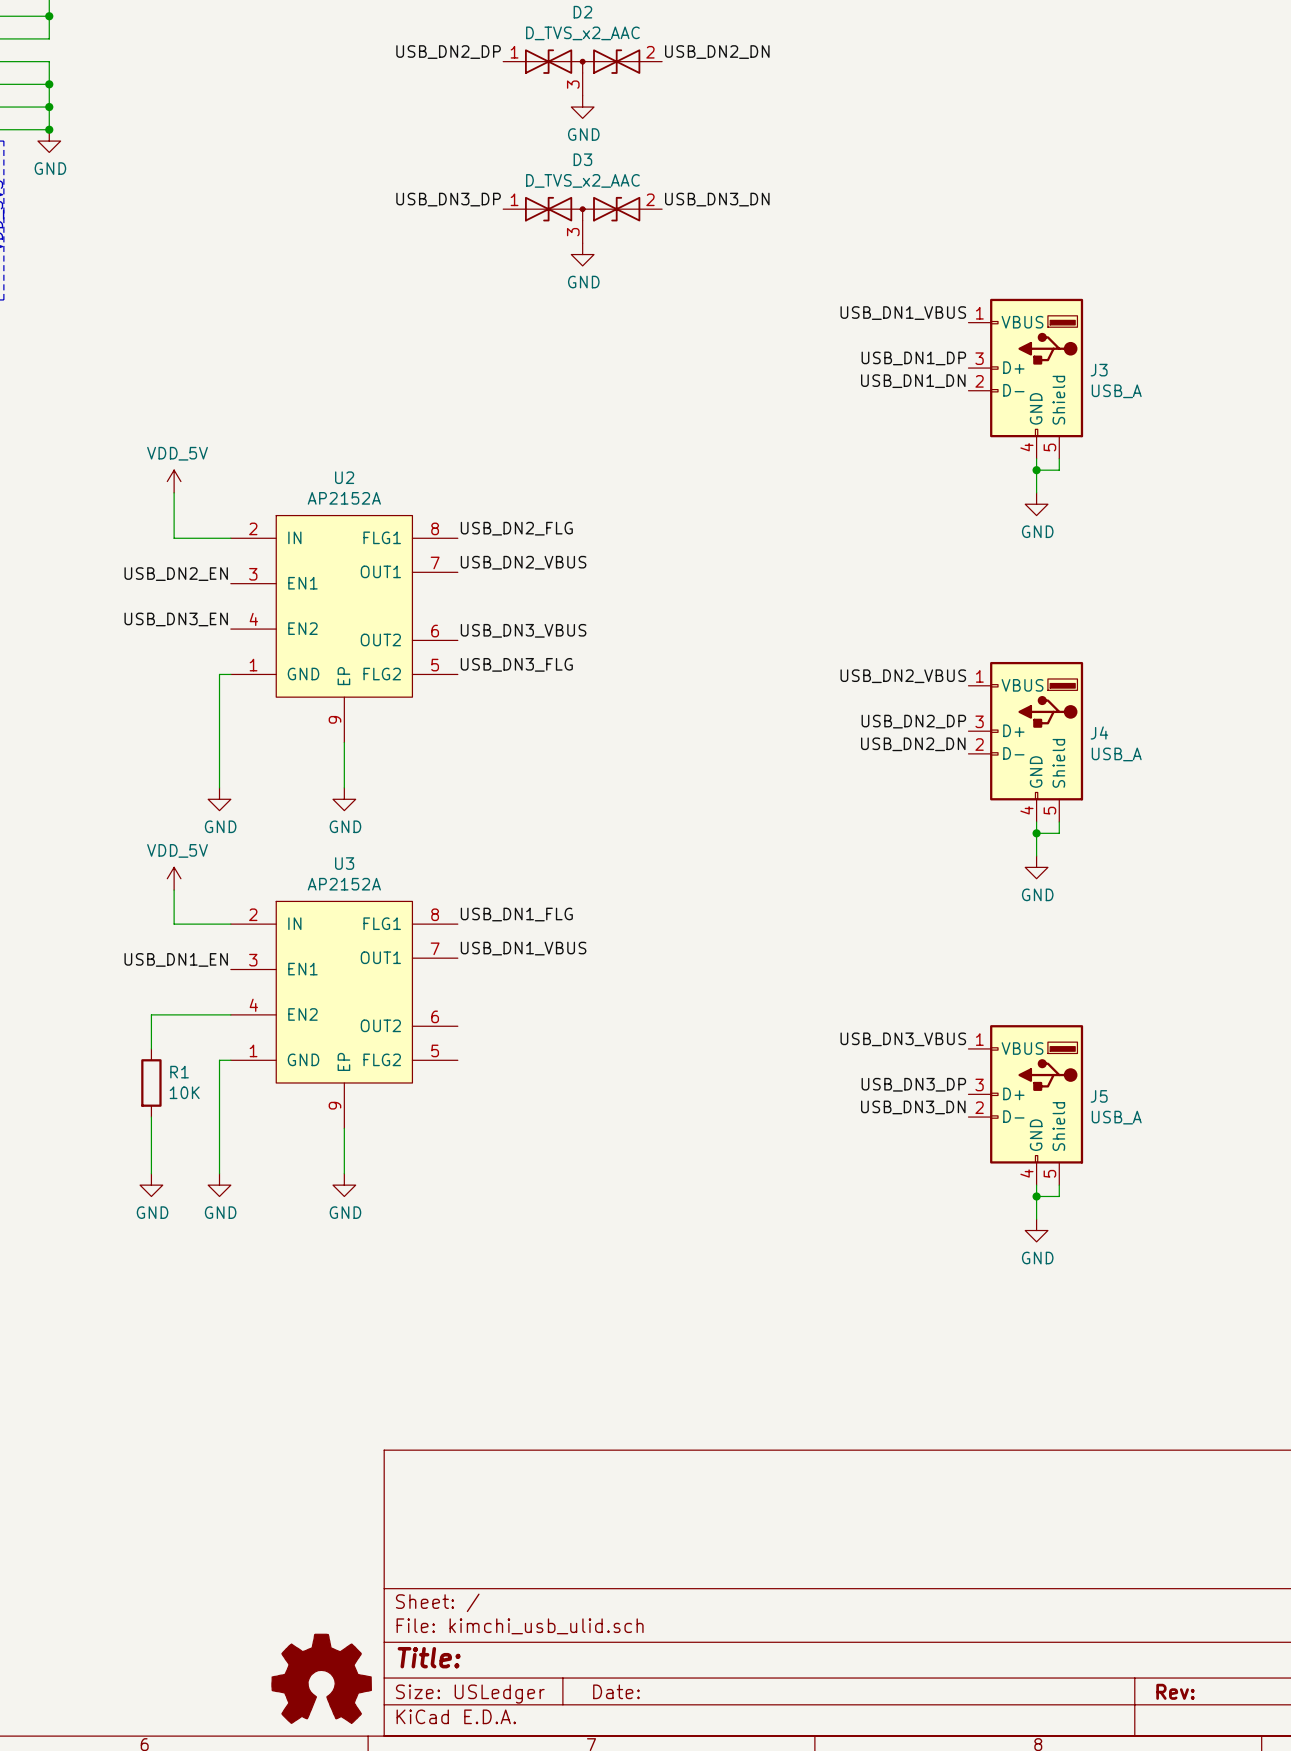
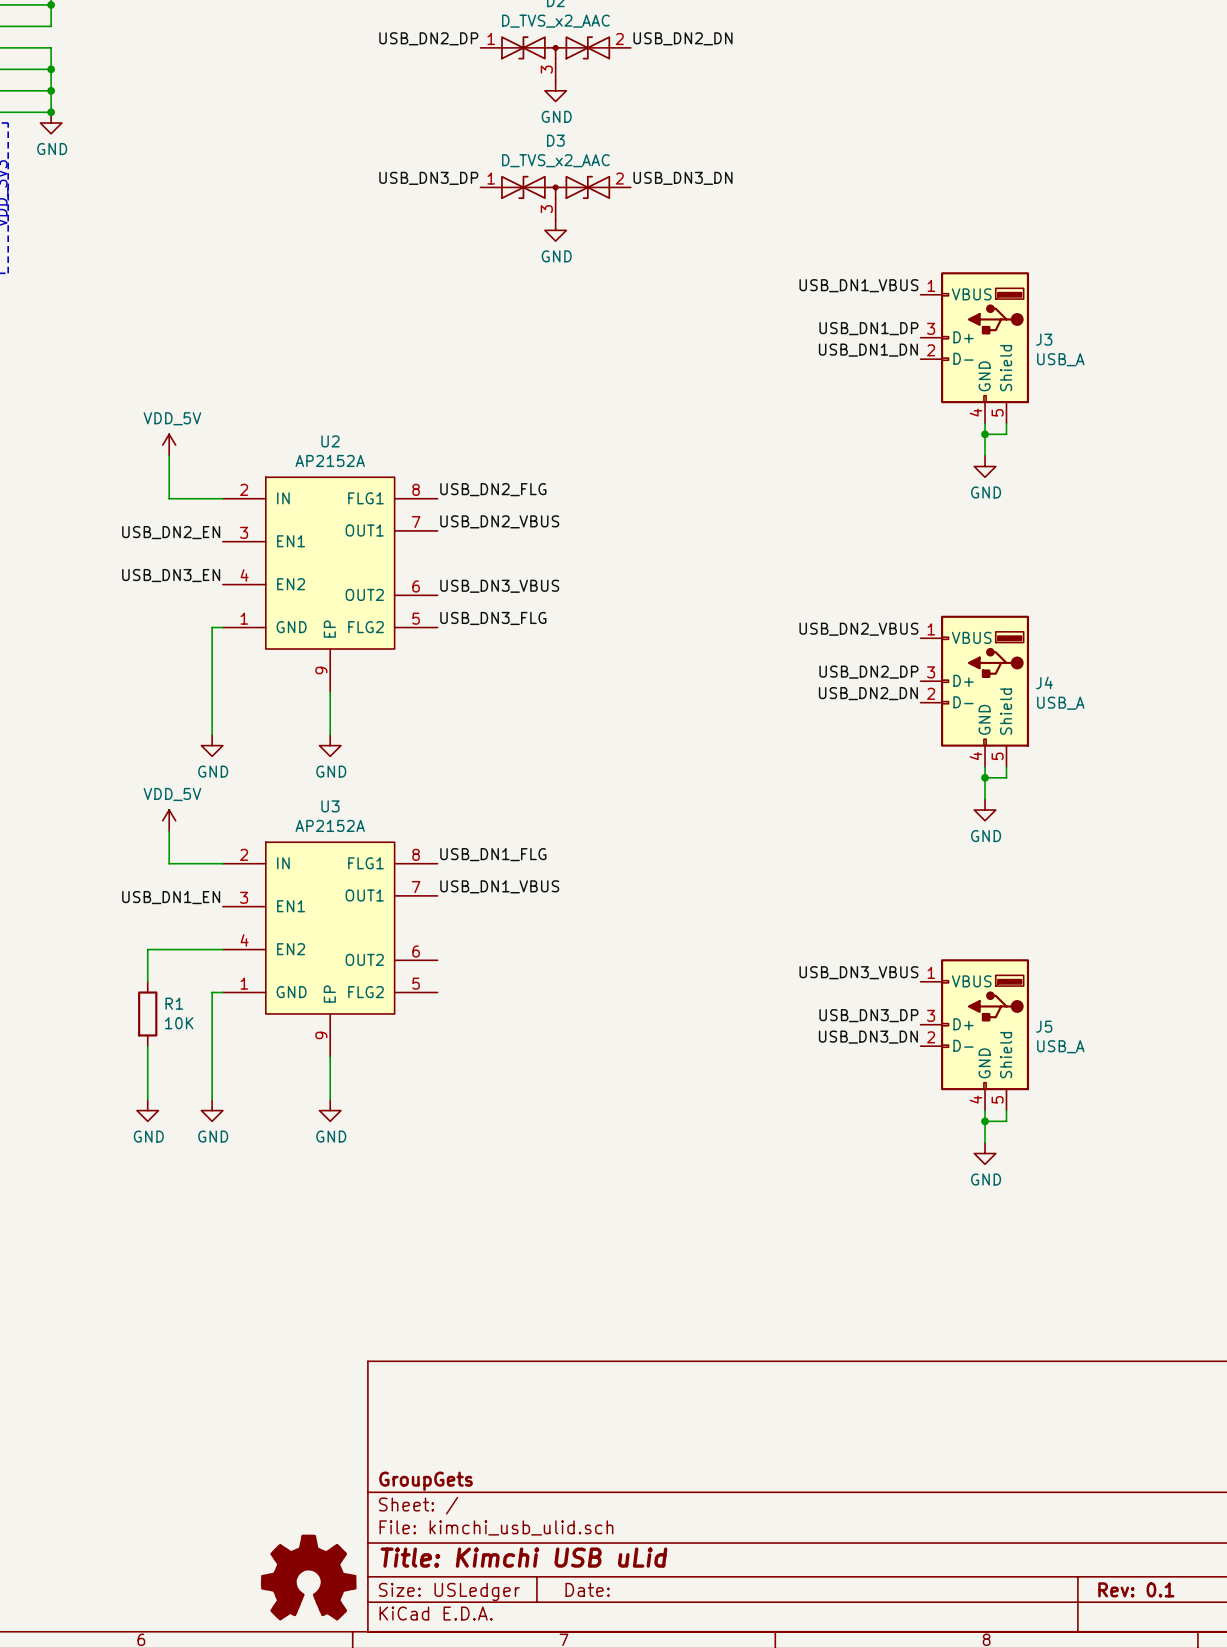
title block: none -> GroupGets (426, 1481)
title block: Title: (429, 1657) -> Title: Kimchi USB uLid (523, 1557)
title block: Rev: (1175, 1691) -> Rev: 0.1 (1136, 1589)

